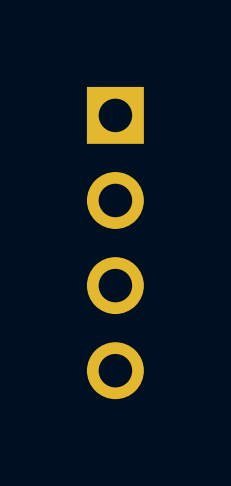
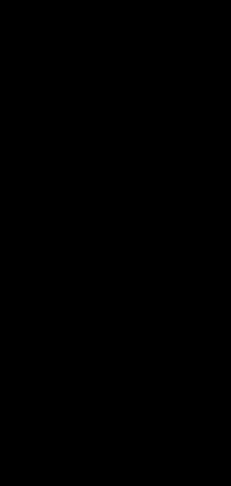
part: (115, 243) -> none

